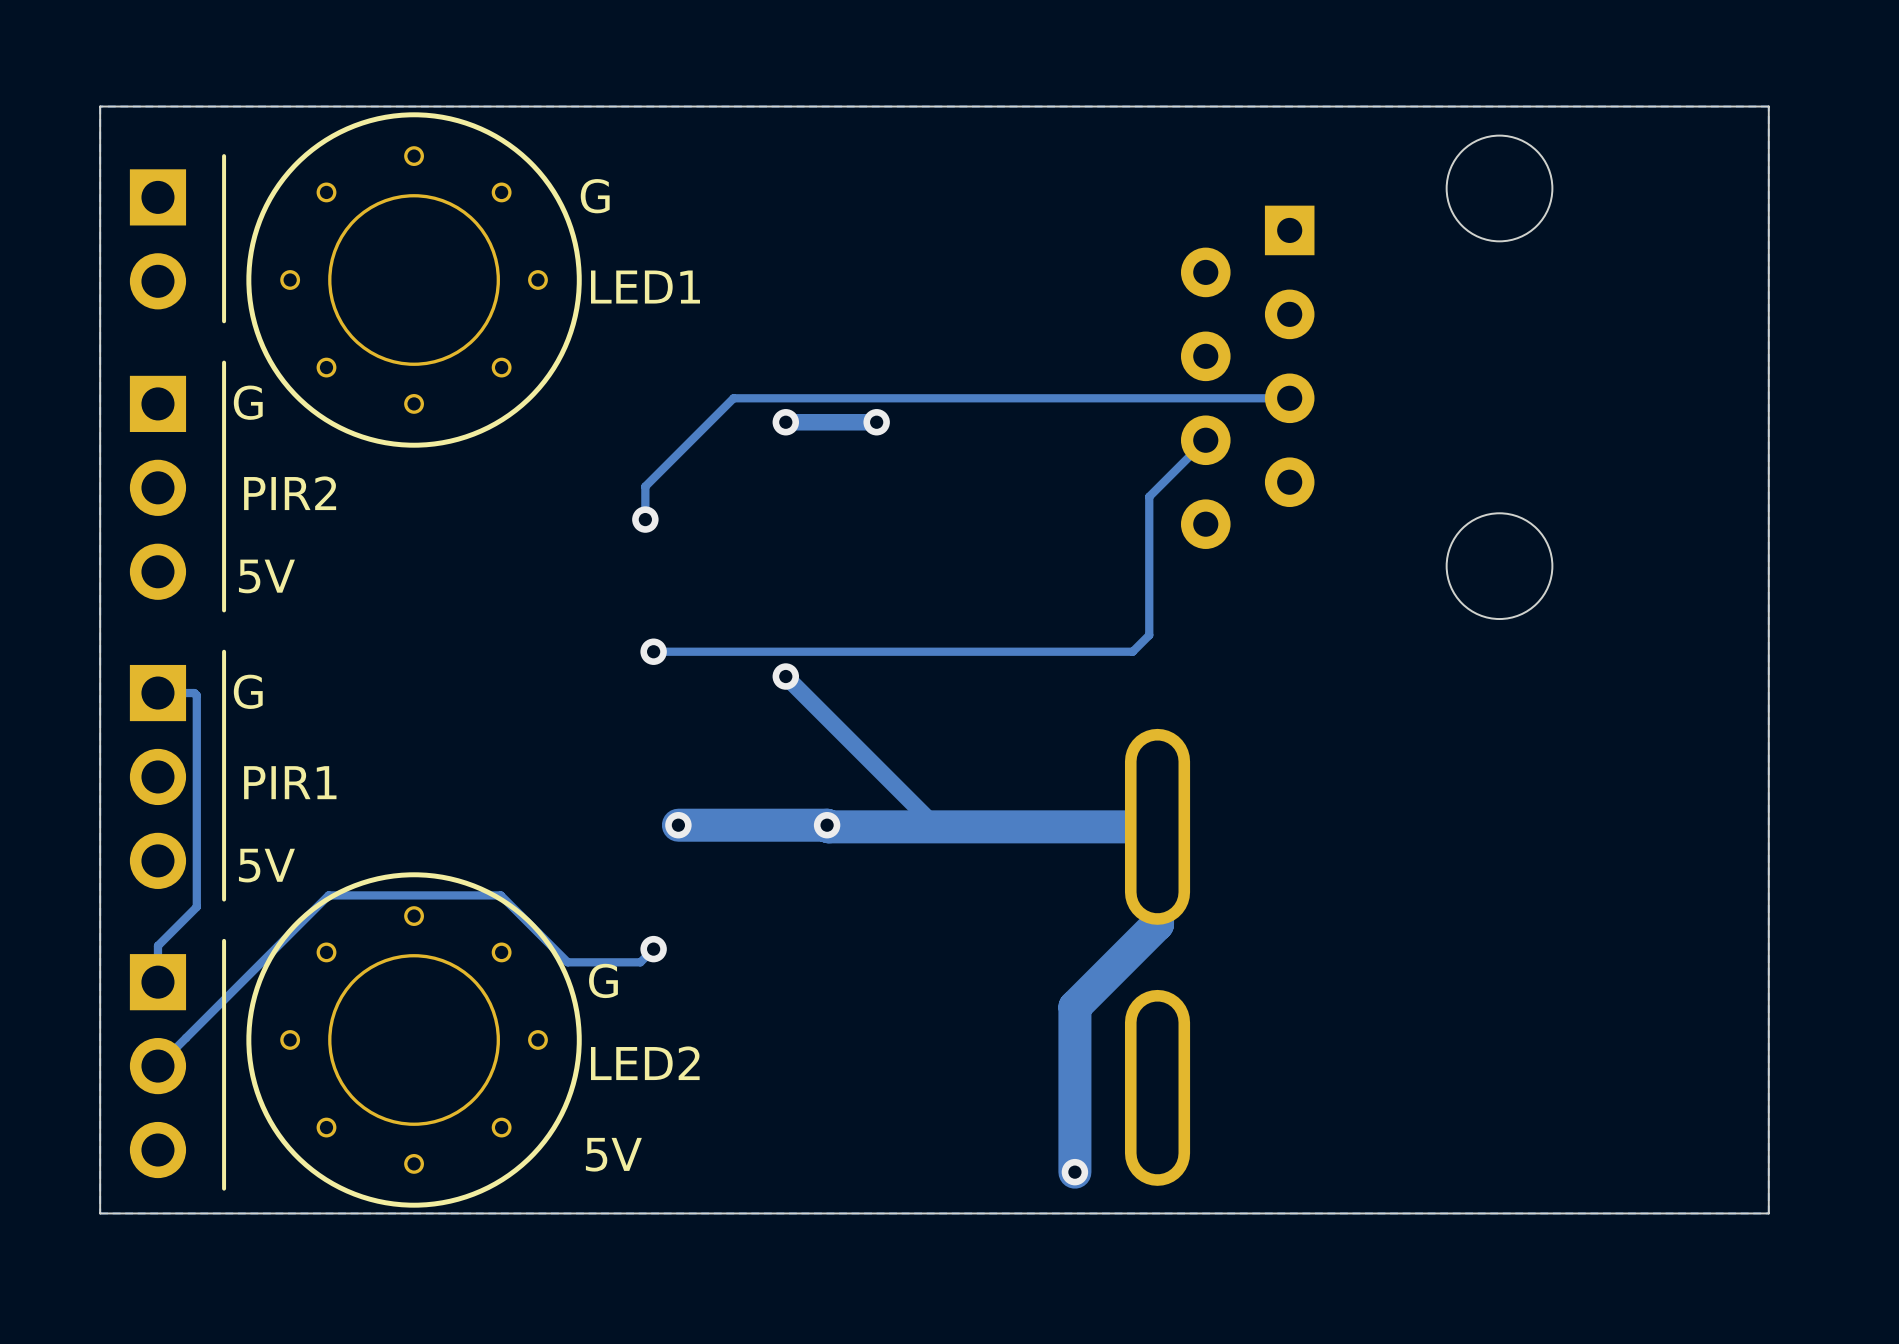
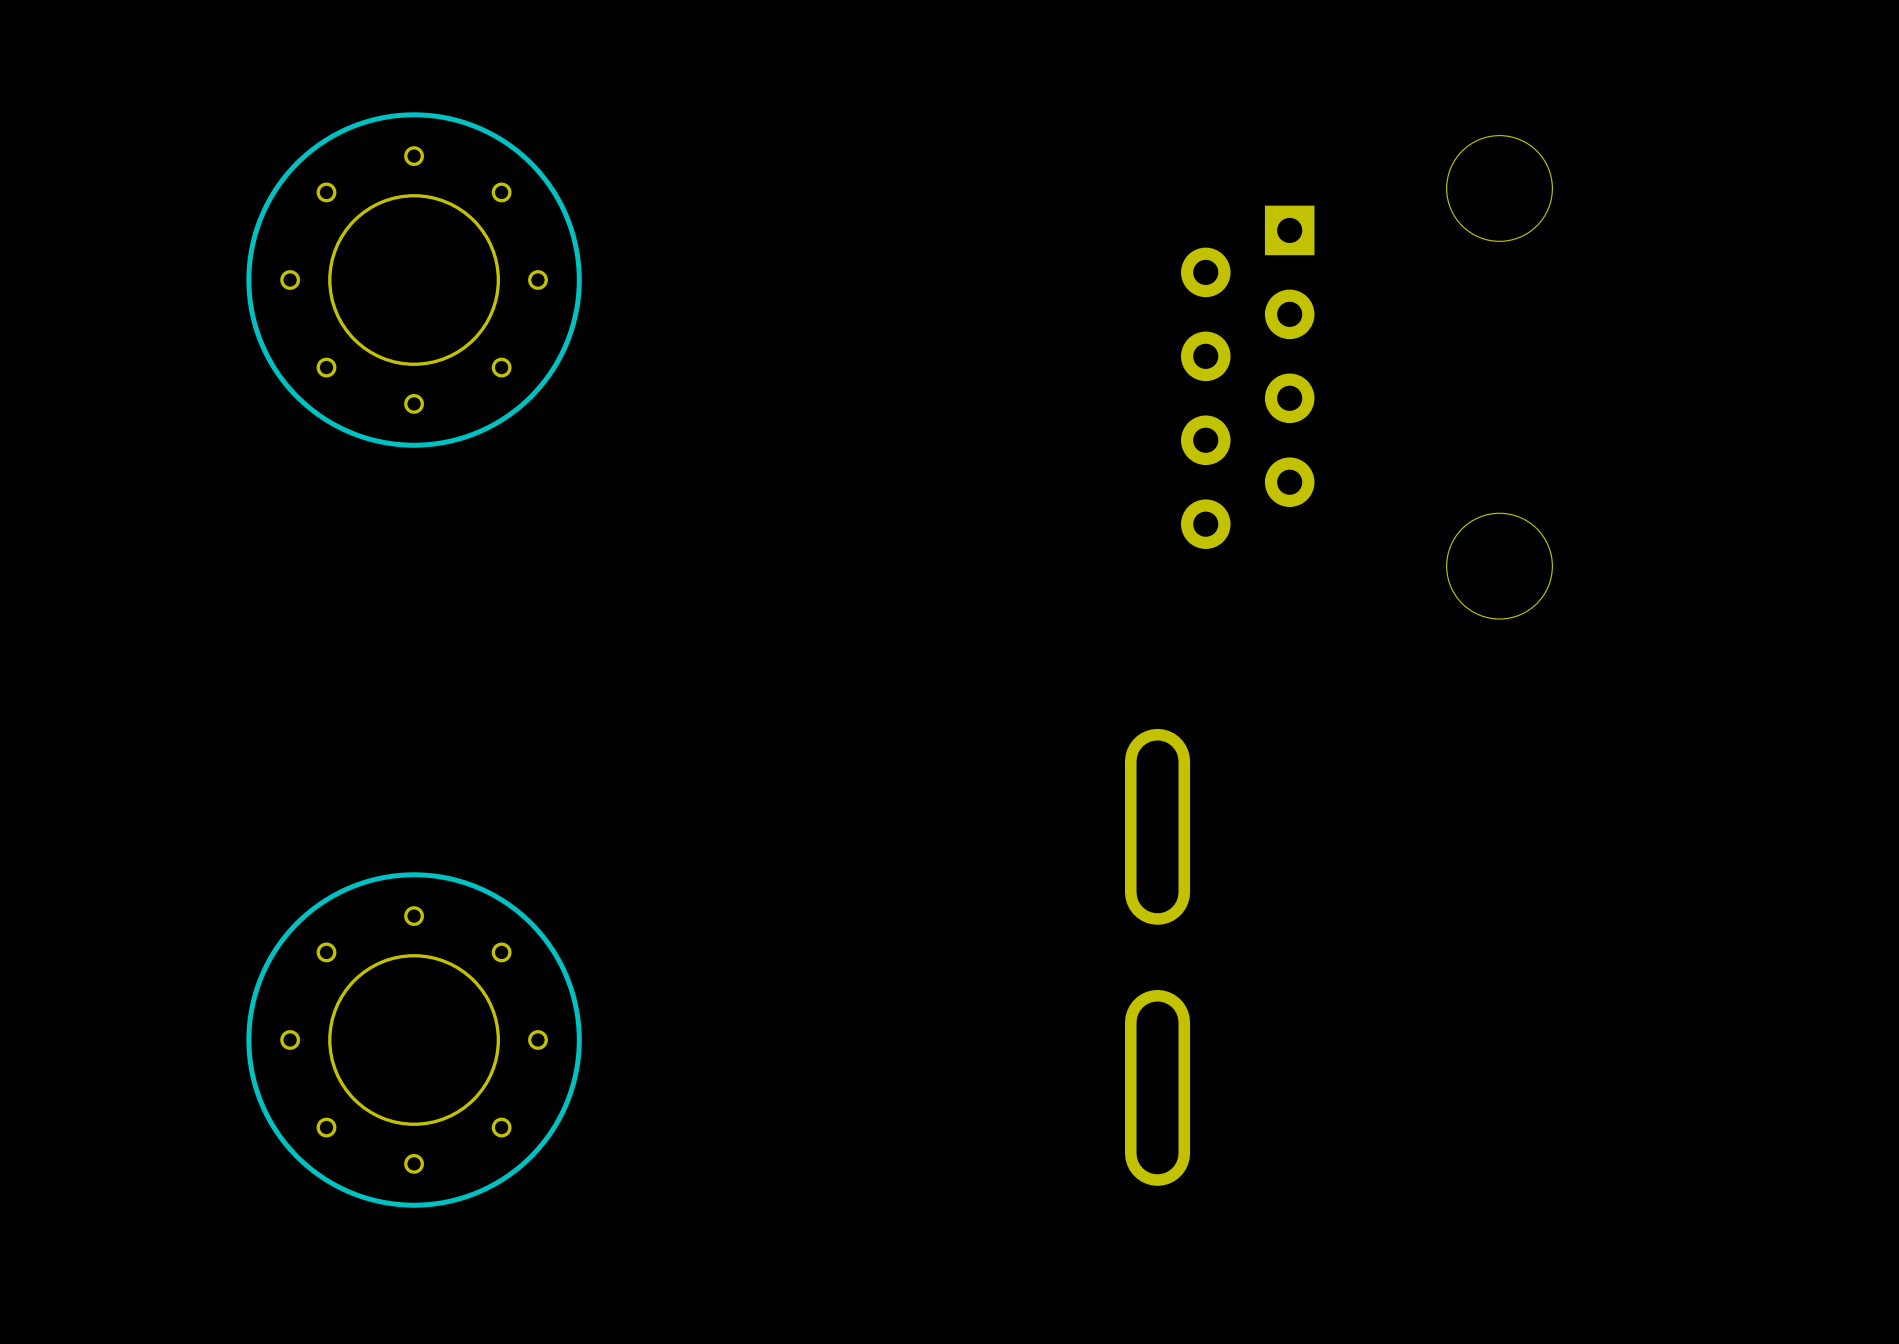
board edge: (1768, 106) (100, 106) (100, 1213) (1768, 1213) (1768, 106) -> none
line: (224, 156) (224, 321) -> none
text: G (595, 196) -> none
part: (157, 239) -> none
text: LED1 (645, 287) -> none
line: (224, 362) (224, 610) -> none
track: (1289, 398) (733, 398) (645, 486) (645, 519) -> none
text: G (248, 402) -> none
via: (785, 422) -> none
track: (876, 422) (785, 422) -> none
via: (876, 422) -> none
track: (1205, 440) (1149, 496) (1149, 635) (1132, 651) (653, 651) -> none
part: (157, 487) -> none
text: PIR2 (290, 493) -> none
via: (645, 519) -> none
text: 5V (266, 576) -> none
line: (224, 651) (224, 899) -> none
via: (653, 651) -> none
track: (785, 676) (936, 826) (1157, 826) -> none
via: (785, 676) -> none
text: G (248, 691) -> none
track: (157, 693) (194, 693) (196, 695) (196, 906) (157, 945) (157, 982) -> none
part: (157, 776) -> none
text: PIR1 (290, 782) -> none
track: (678, 825) (1157, 826) -> none
via: (678, 825) -> none
via: (827, 825) -> none
track: (1157, 826) (1157, 924) (1074, 1006) (1074, 1172) -> none
text: 5V (266, 865) -> none
line: (224, 940) (224, 1188) -> none
track: (653, 949) (640, 962) (567, 962) (500, 895) (328, 895) (157, 1066) -> none
via: (653, 949) -> none
text: G (603, 980) -> none
text: LED2 (645, 1063) -> none
part: (157, 1066) -> none
text: 5V (613, 1154) -> none
via: (1074, 1172) -> none

